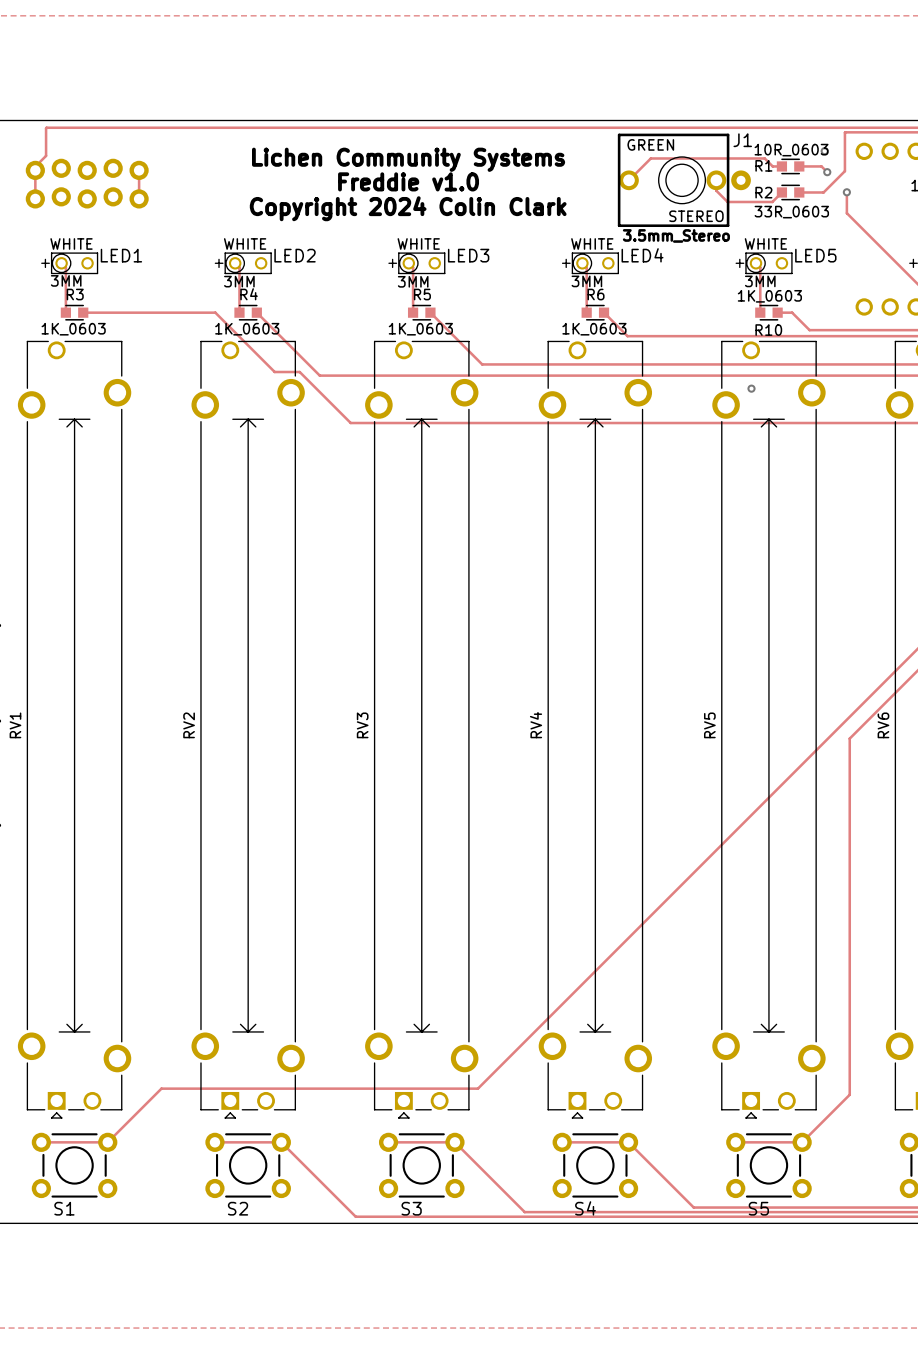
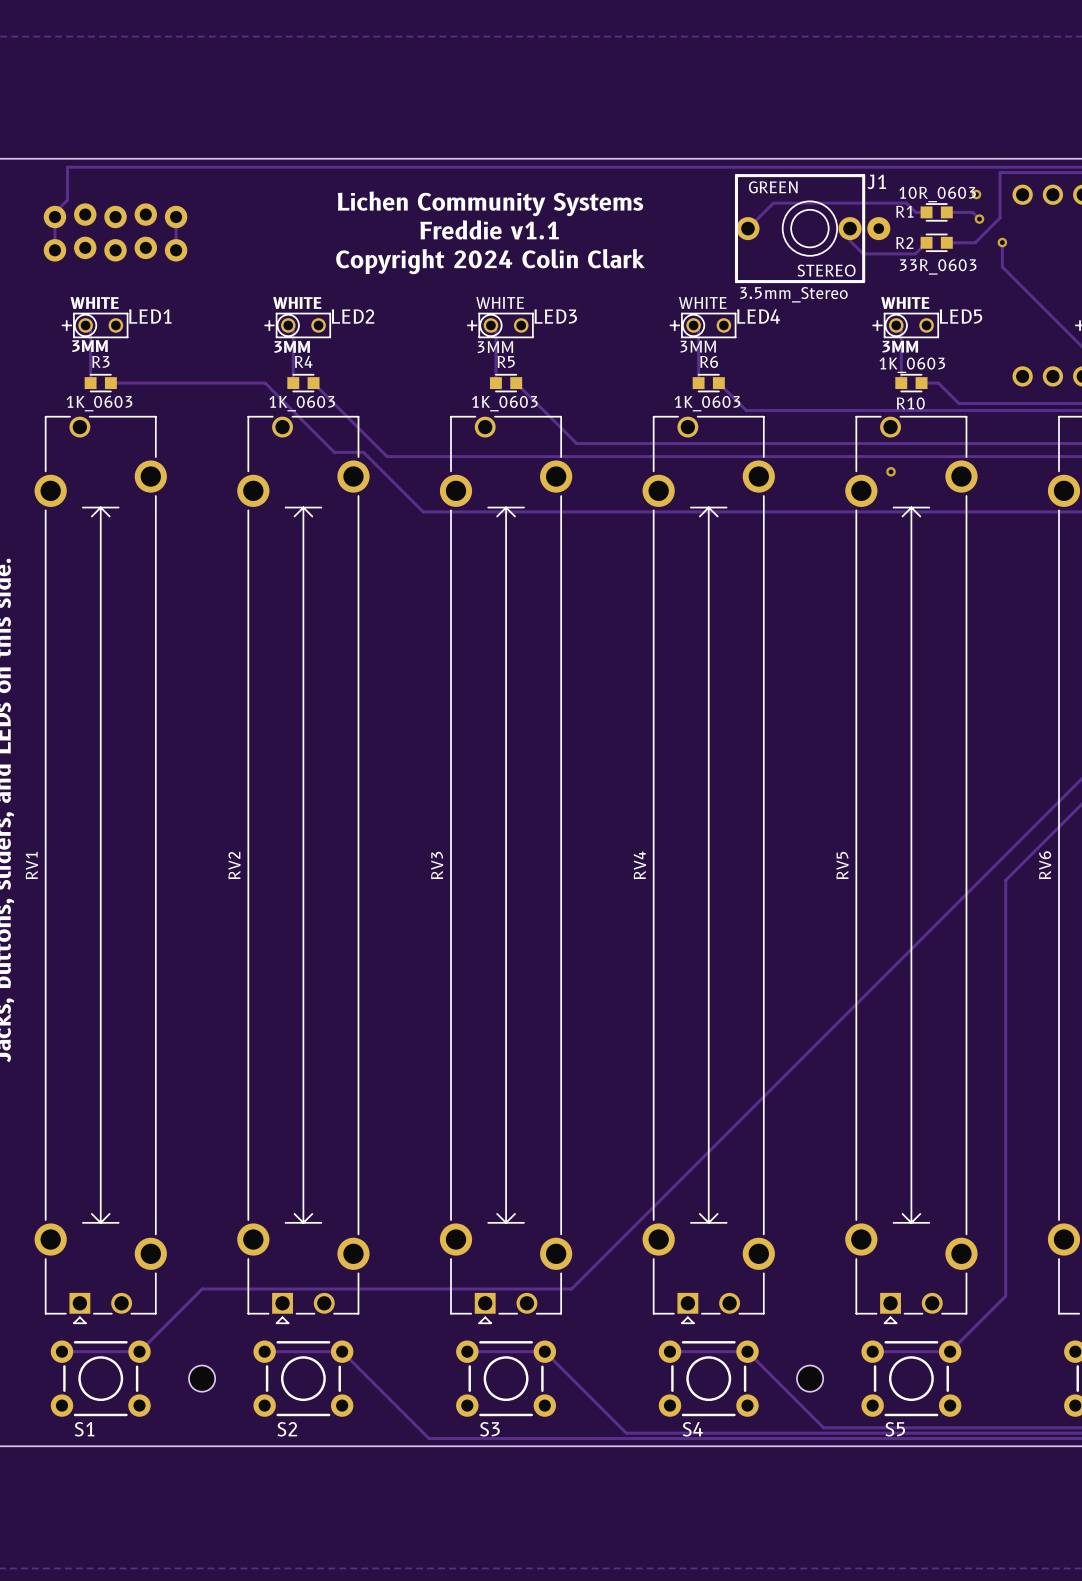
text: Freddie v1.0 (408, 181) -> Freddie v1.1 (489, 229)
part: none -> (202, 1378)
part: none -> (810, 1378)

